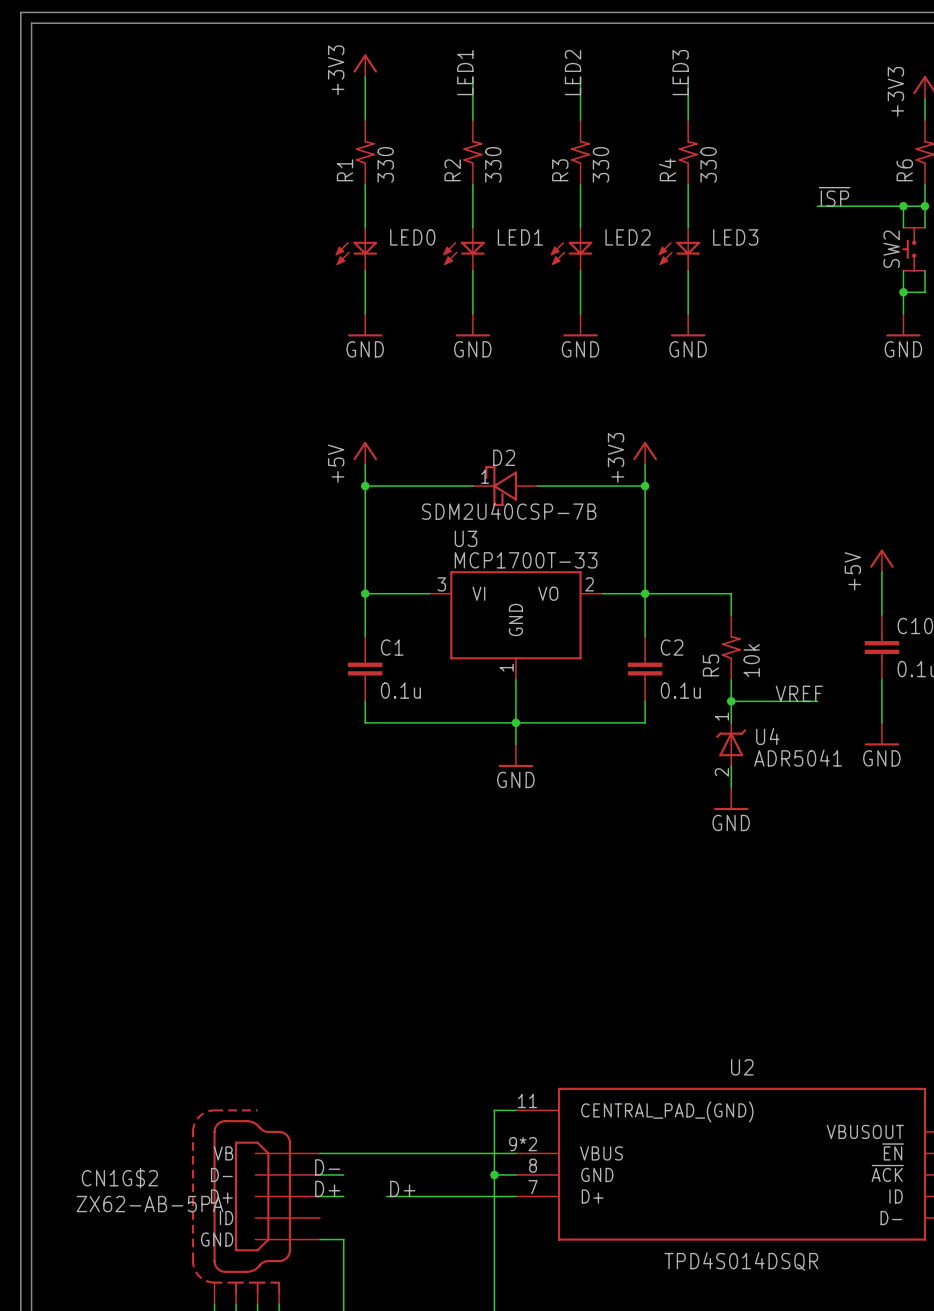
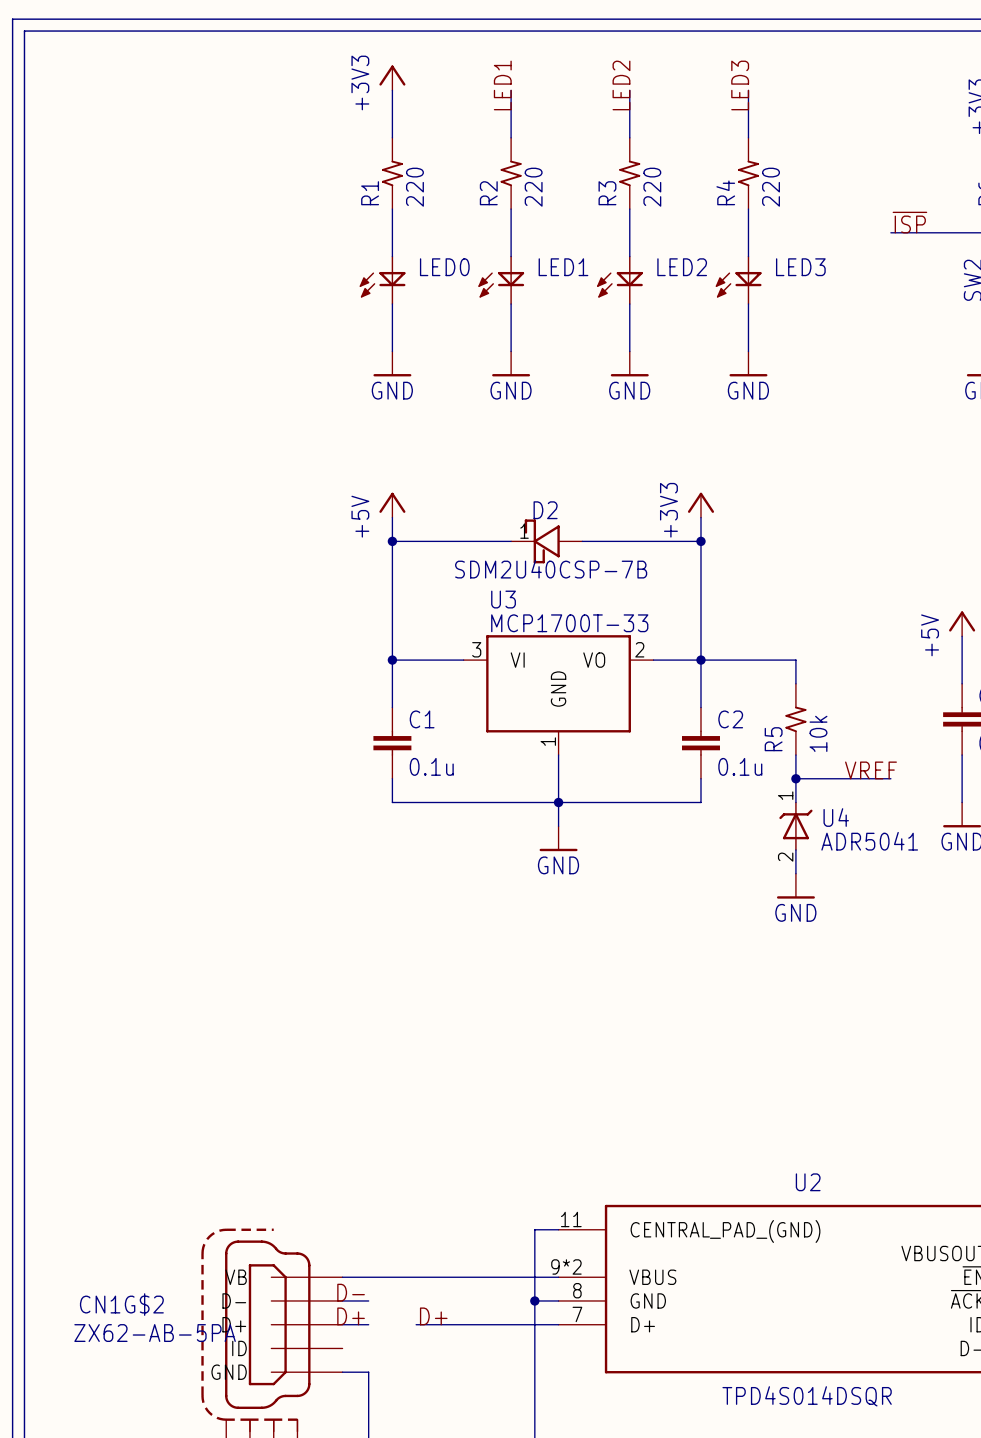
R1 value: 330 (385, 164) -> 220 (414, 187)
R2 value: 330 (493, 164) -> 220 (533, 187)
R3 value: 330 (600, 164) -> 220 (652, 187)
R4 value: 330 (708, 164) -> 220 (771, 187)

